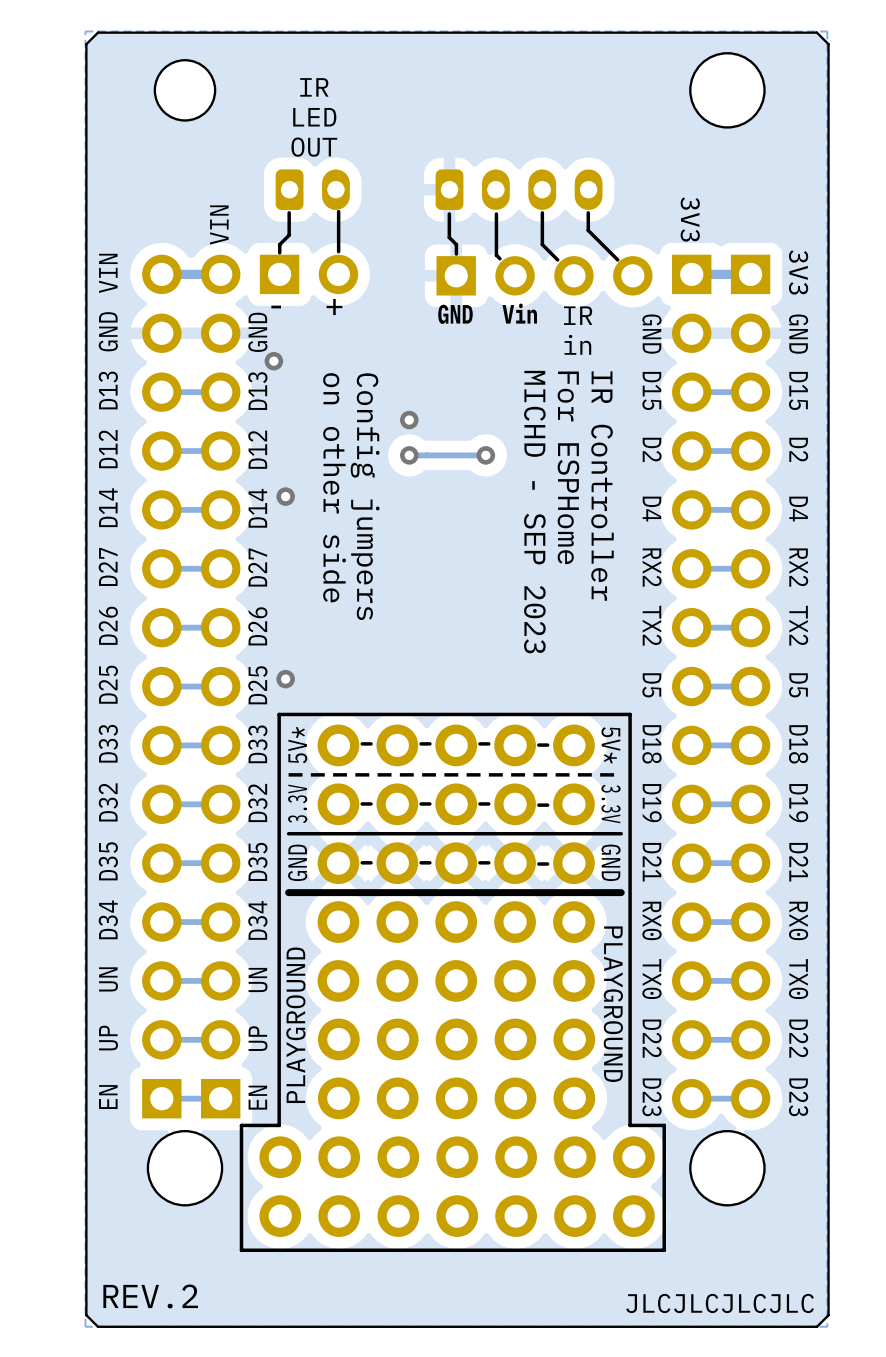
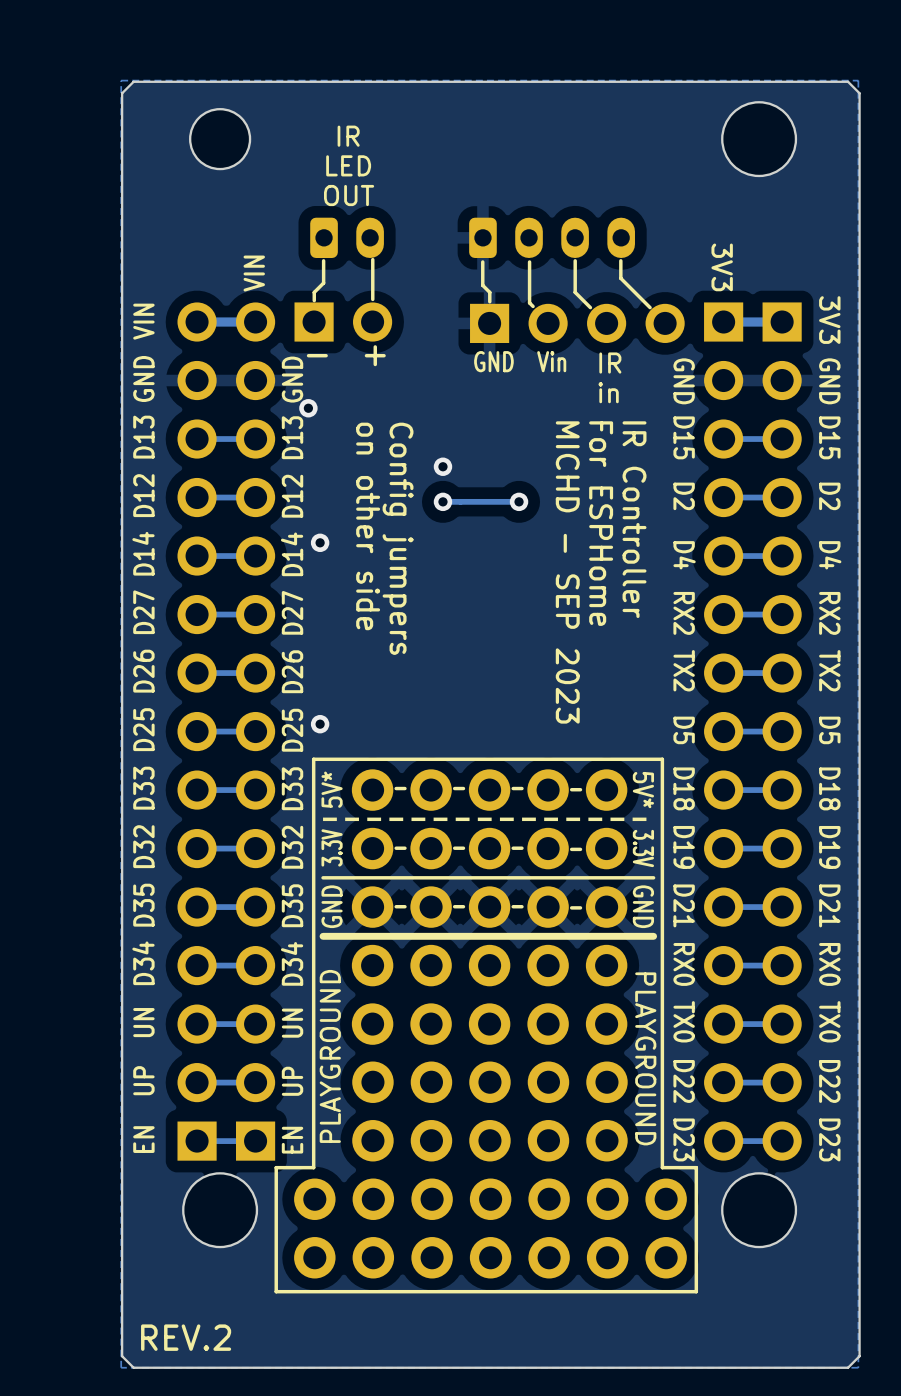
text: JLCJLCJLCJLC (720, 1303) -> none

